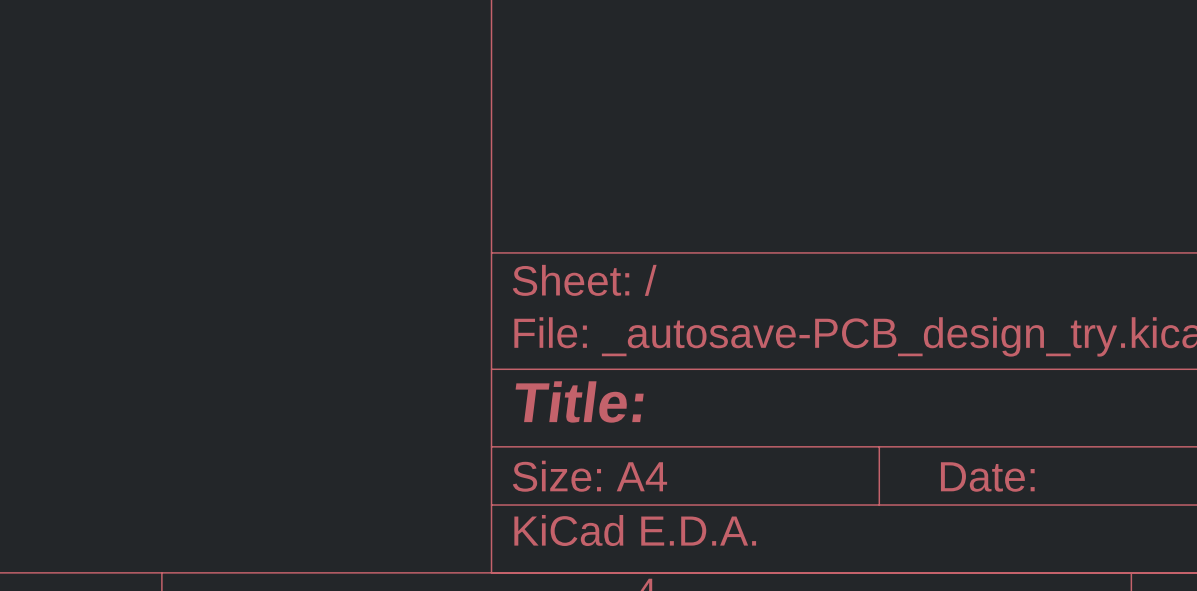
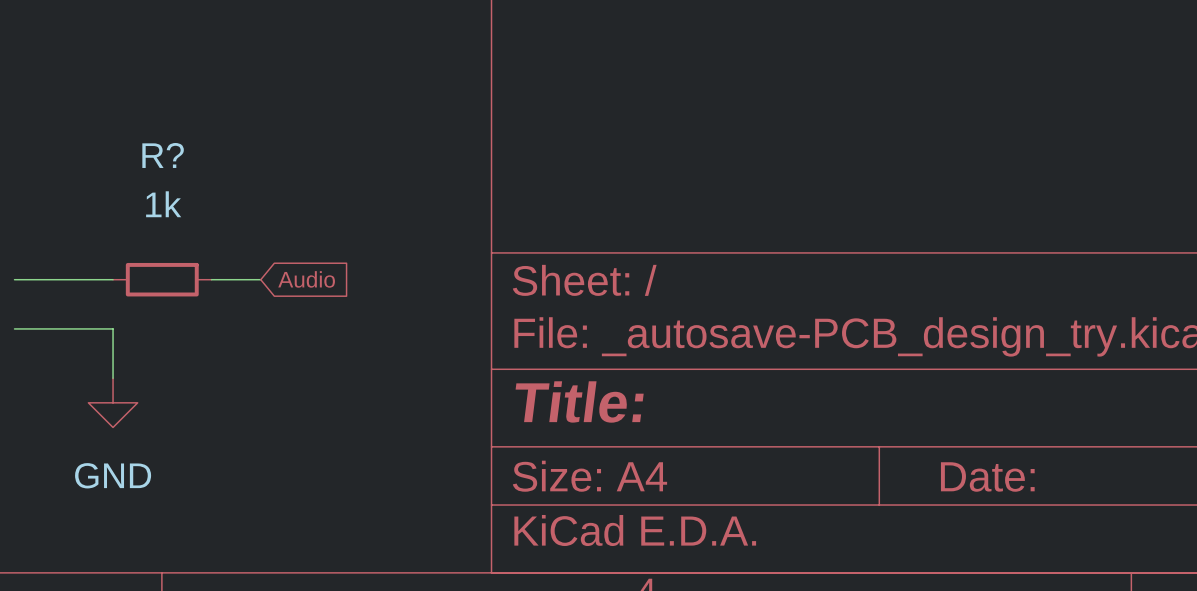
wire: none -> (14, 279) (113, 279)
R?: none -> 1k (162, 279)
wire: none -> (211, 279) (260, 279)
global label: none -> Audio (306, 279)
wire: none -> (14, 328) (113, 328) (113, 378)
power symbol: none -> GND (113, 402)

